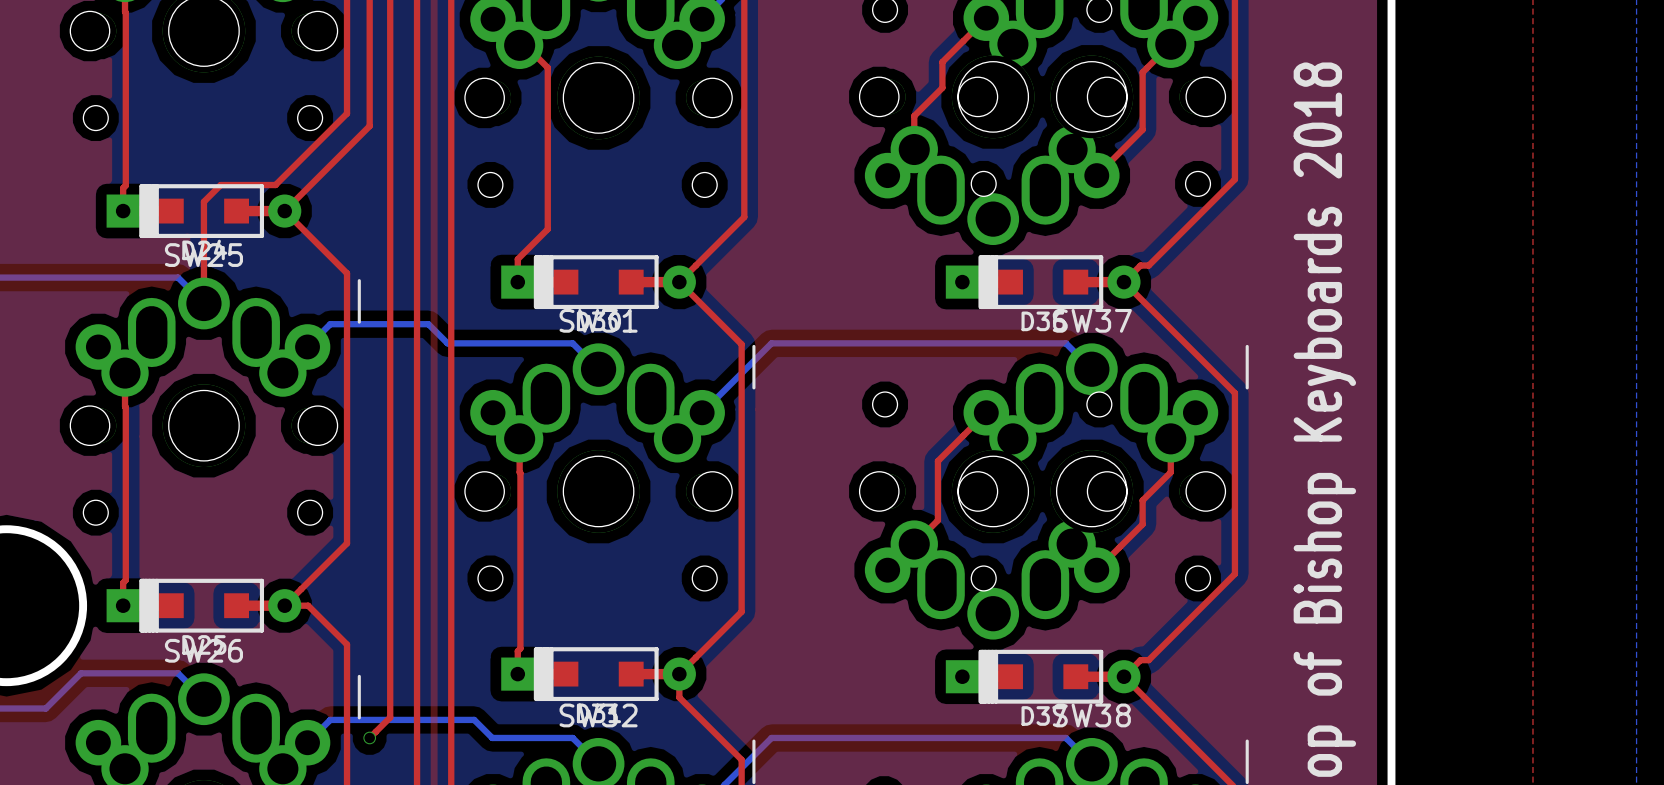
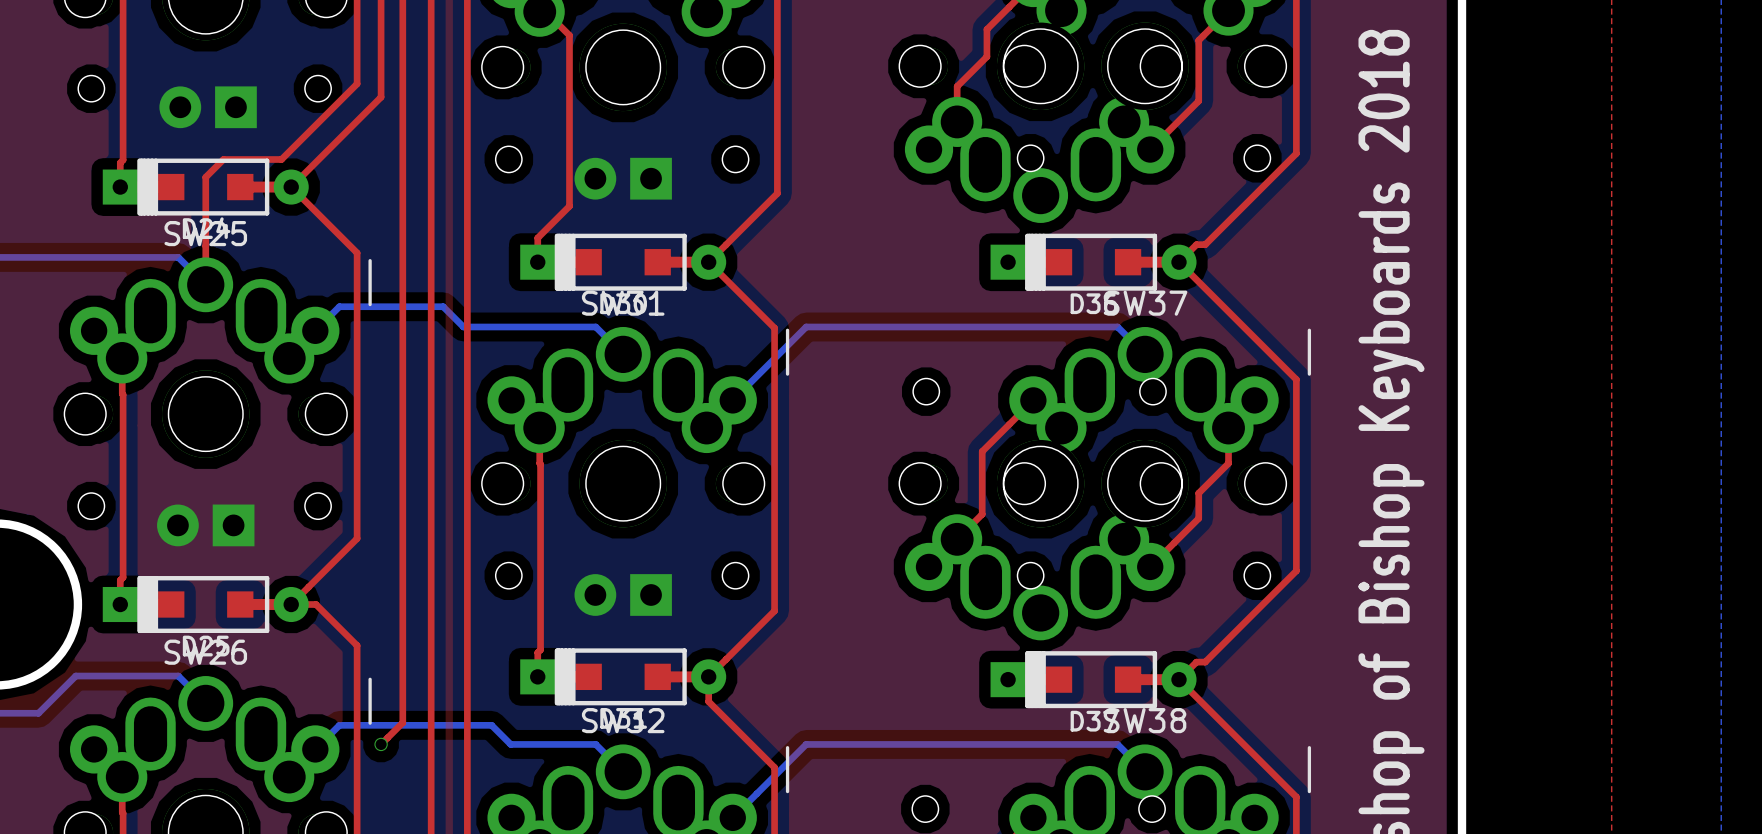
part: none -> (208, 107)
part: none -> (623, 178)
part: none -> (205, 525)
part: none -> (623, 594)

